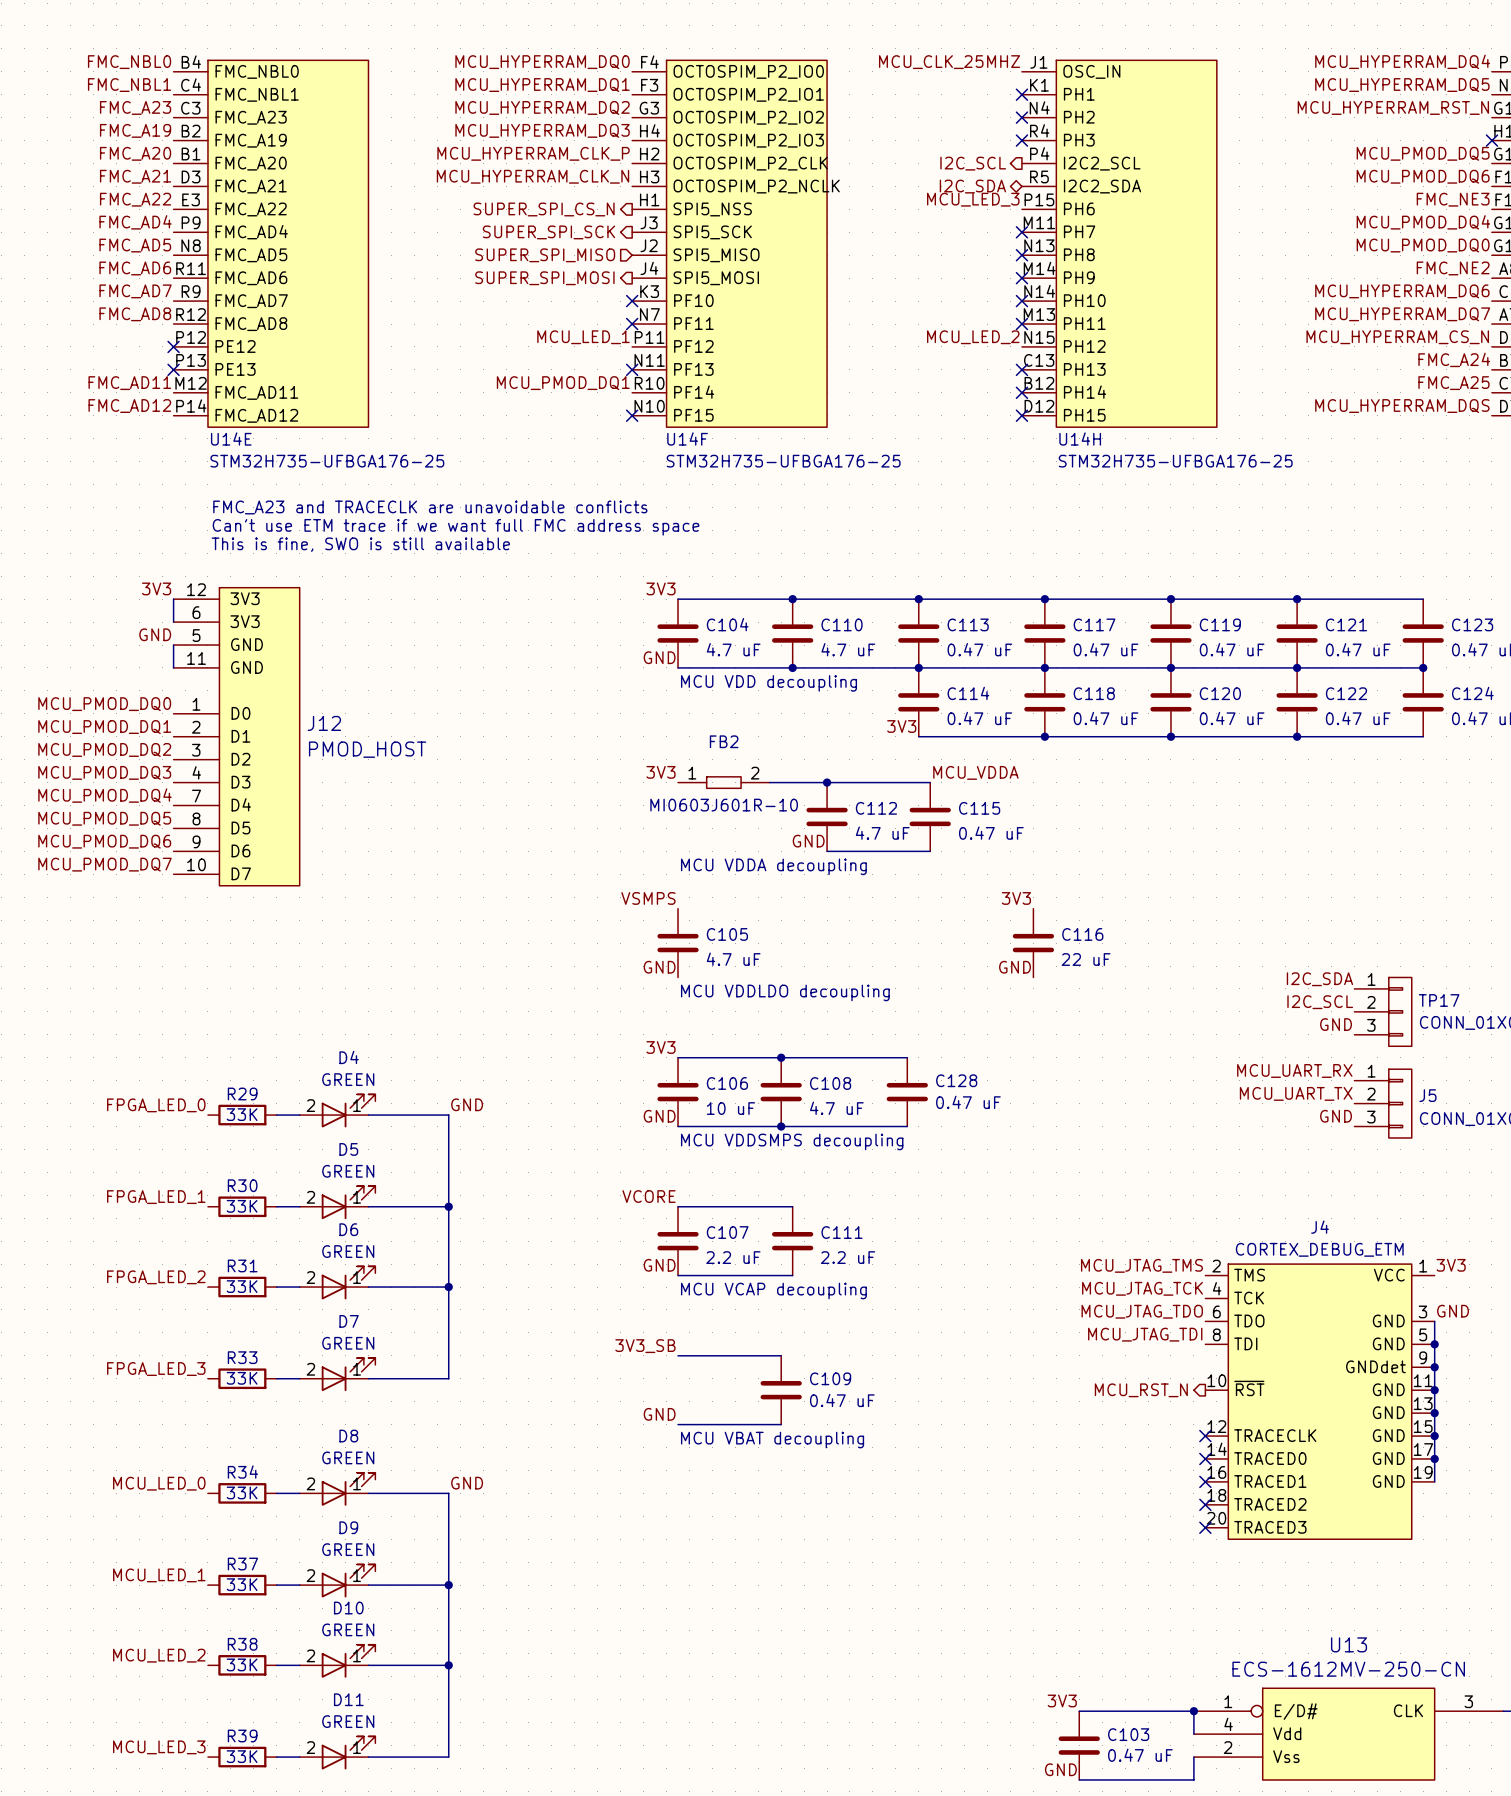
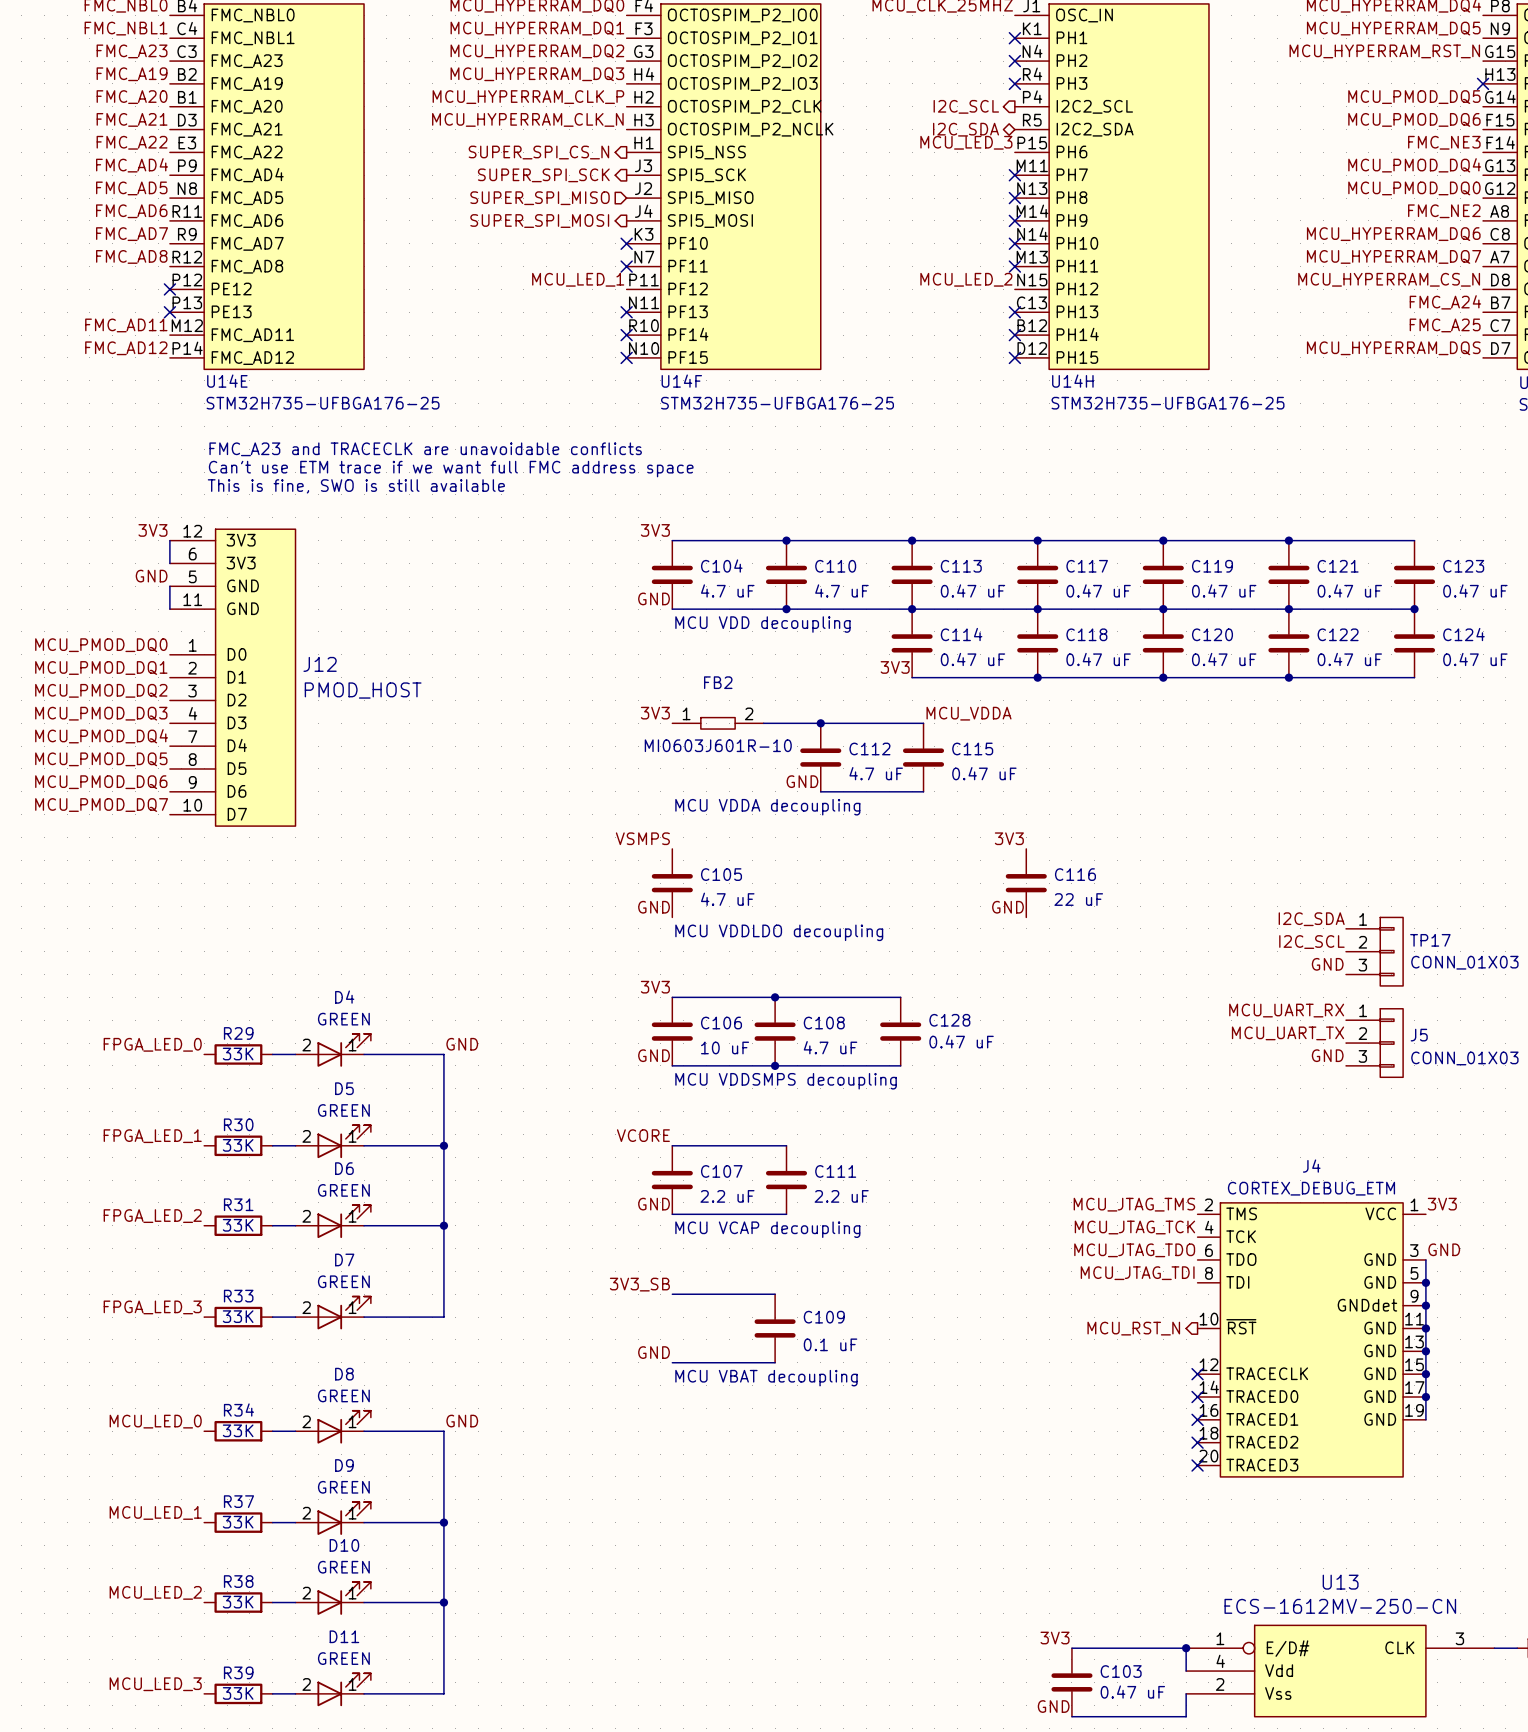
label: MCU_PMOD_DQ1 (563, 383) -> none
no-connect mark: none -> (626, 335)
C109 value: 0.47 uF (842, 1400) -> 0.1 uF (830, 1344)

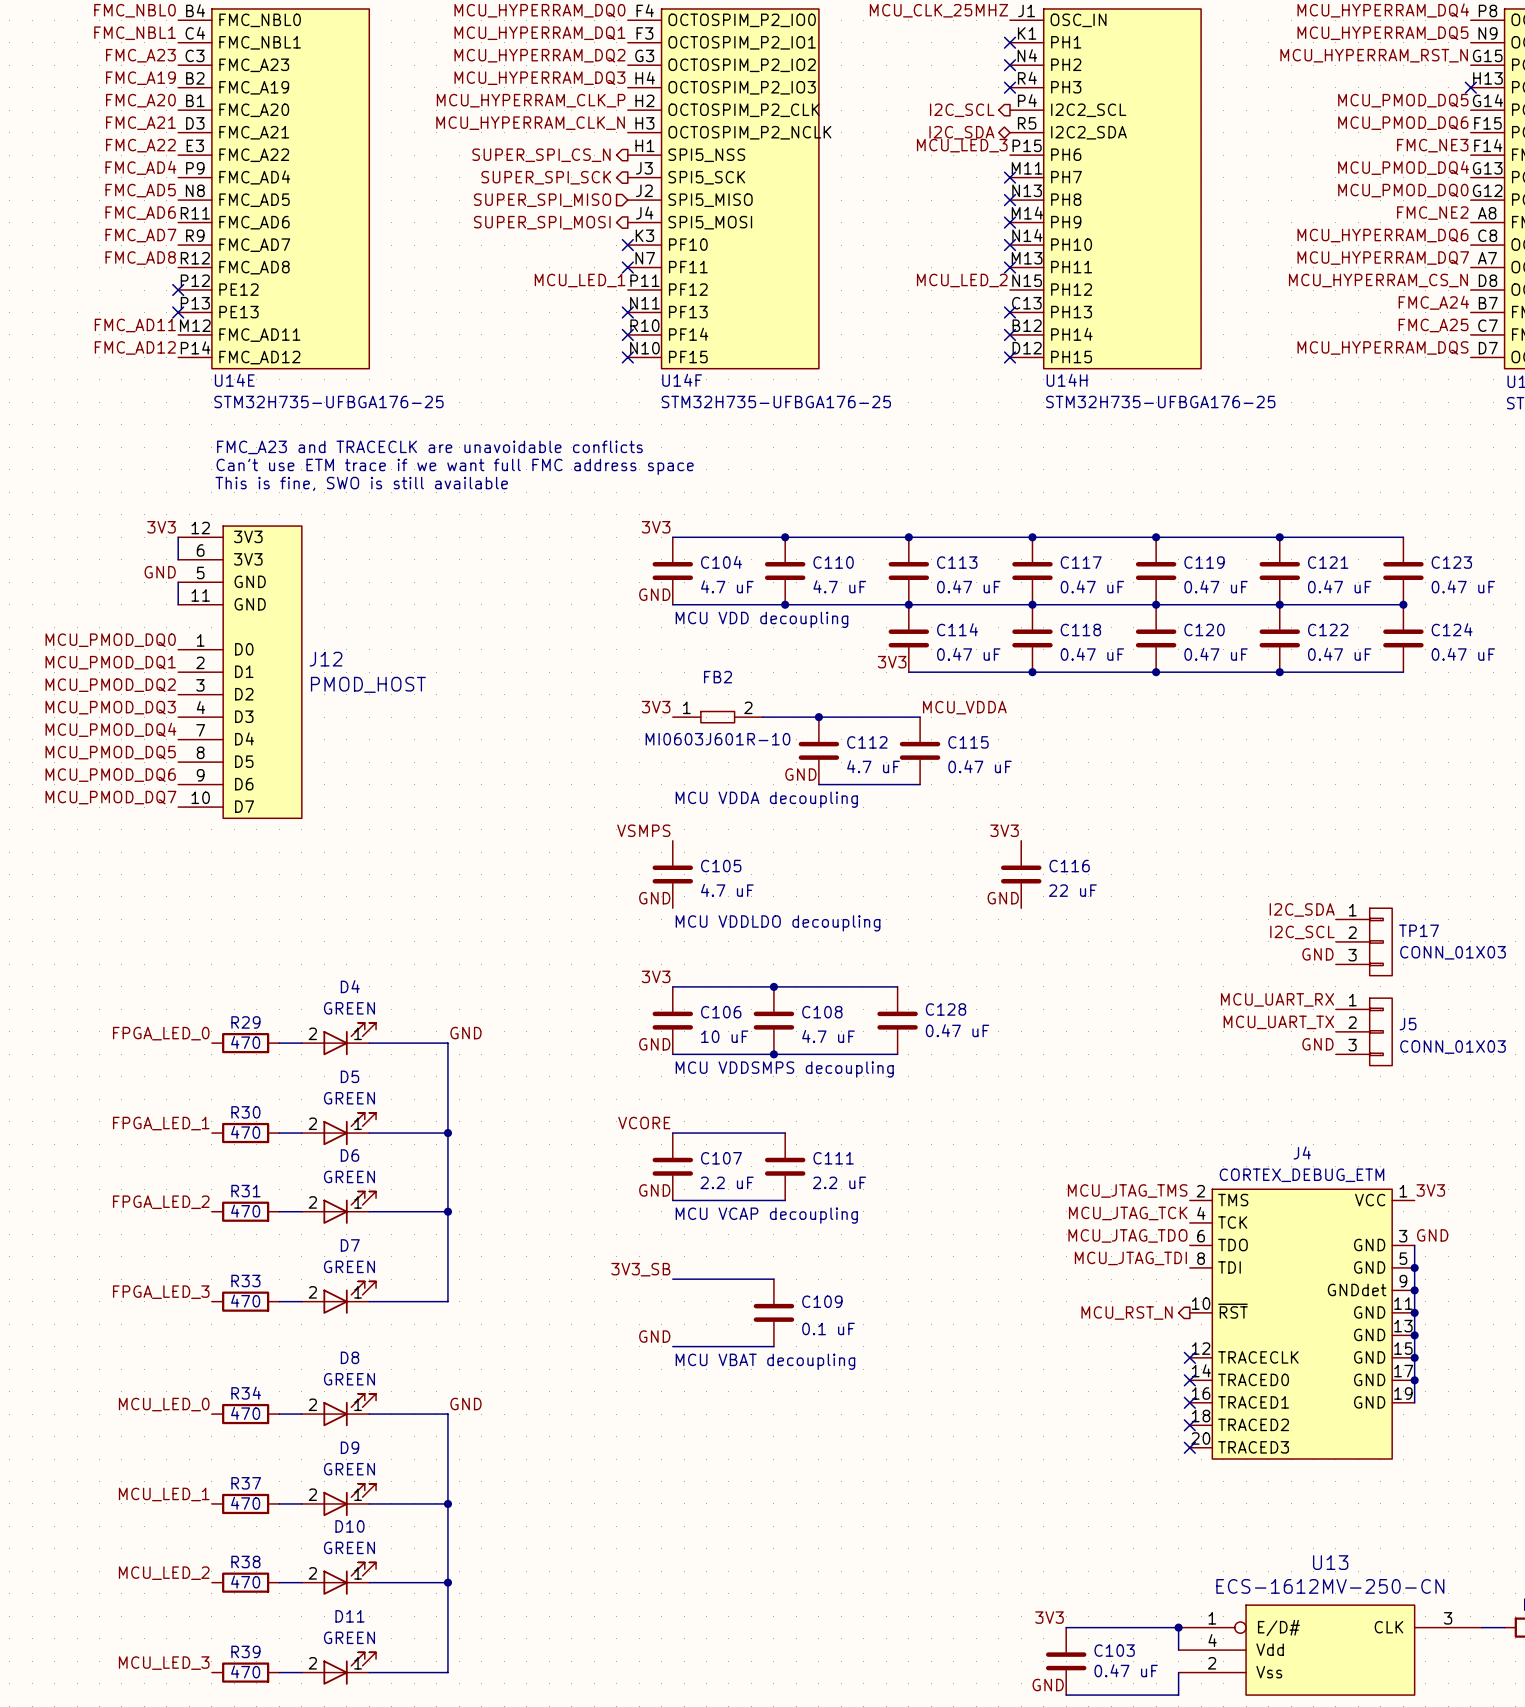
R29 value: 33K (238, 1054) -> 470 (245, 1042)
R30 value: 33K (238, 1145) -> 470 (245, 1132)
R31 value: 33K (238, 1225) -> 470 (245, 1211)
R33 value: 33K (238, 1316) -> 470 (245, 1300)
R34 value: 33K (238, 1430) -> 470 (245, 1413)
R37 value: 33K (238, 1522) -> 470 (245, 1503)
R38 value: 33K (238, 1602) -> 470 (245, 1581)
R39 value: 33K (238, 1693) -> 470 (245, 1671)

